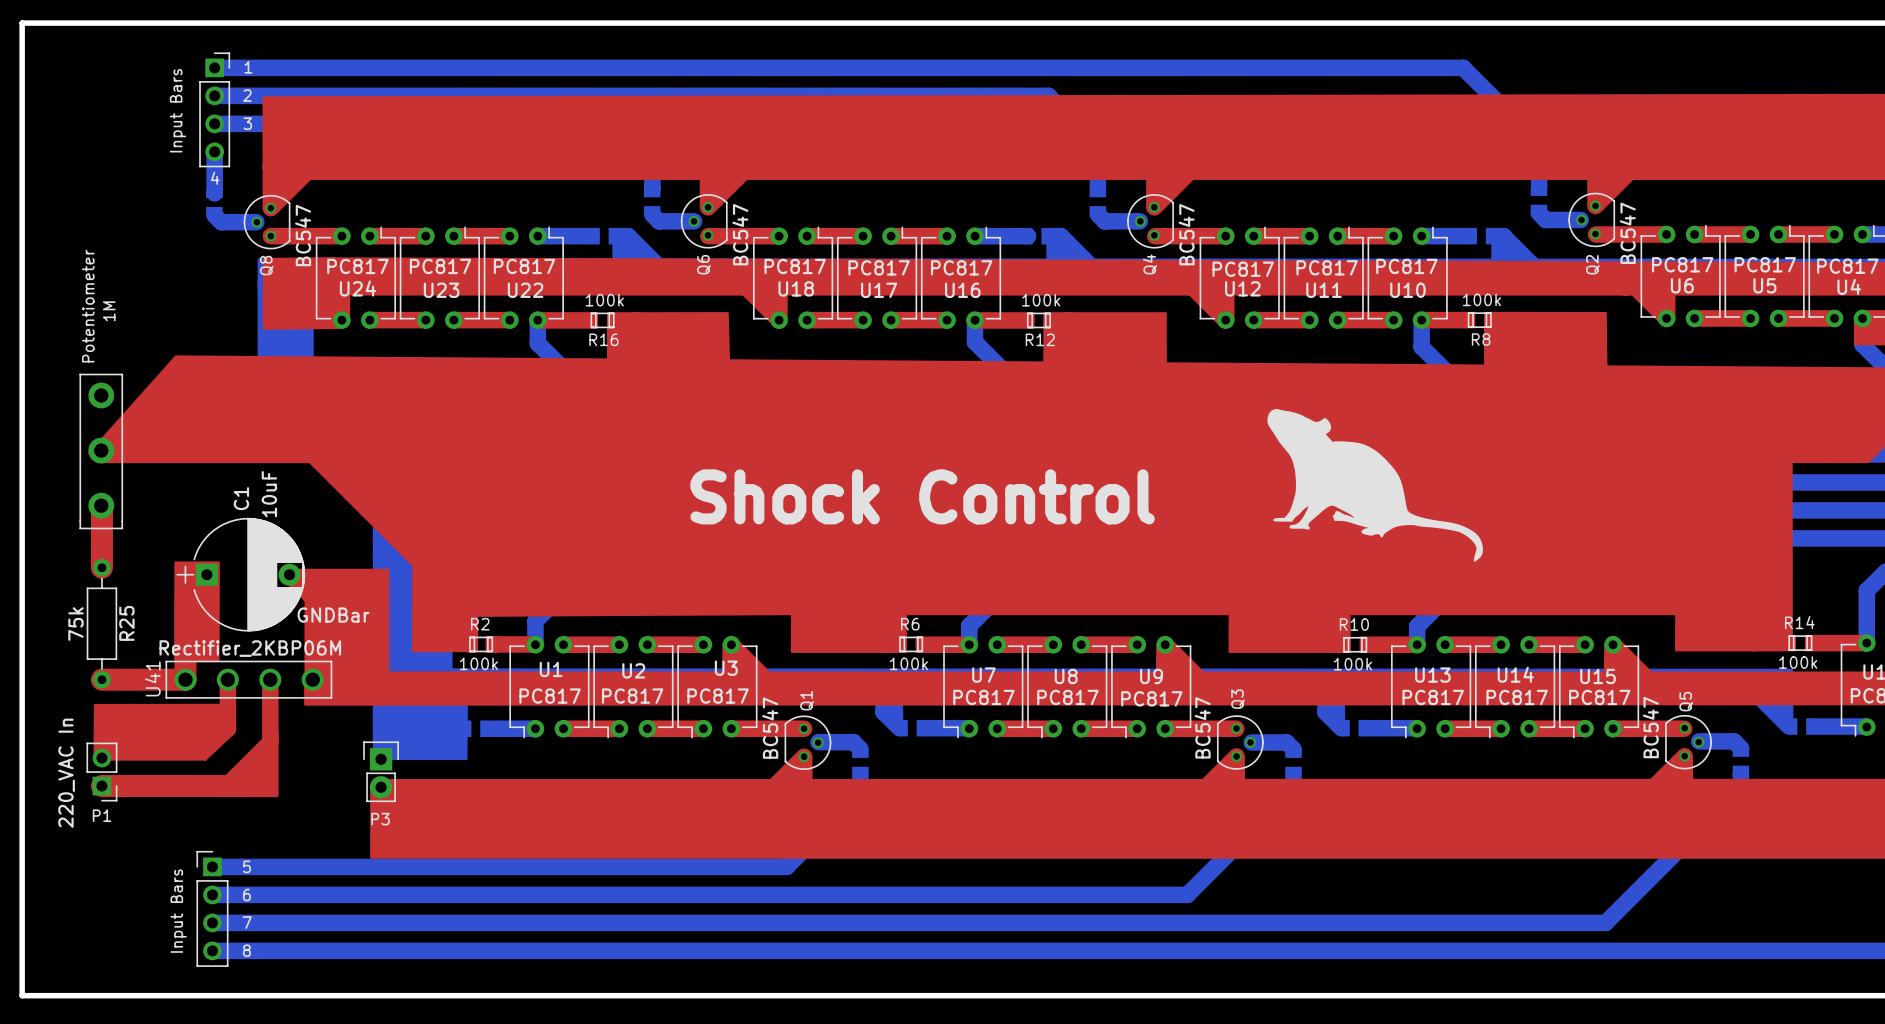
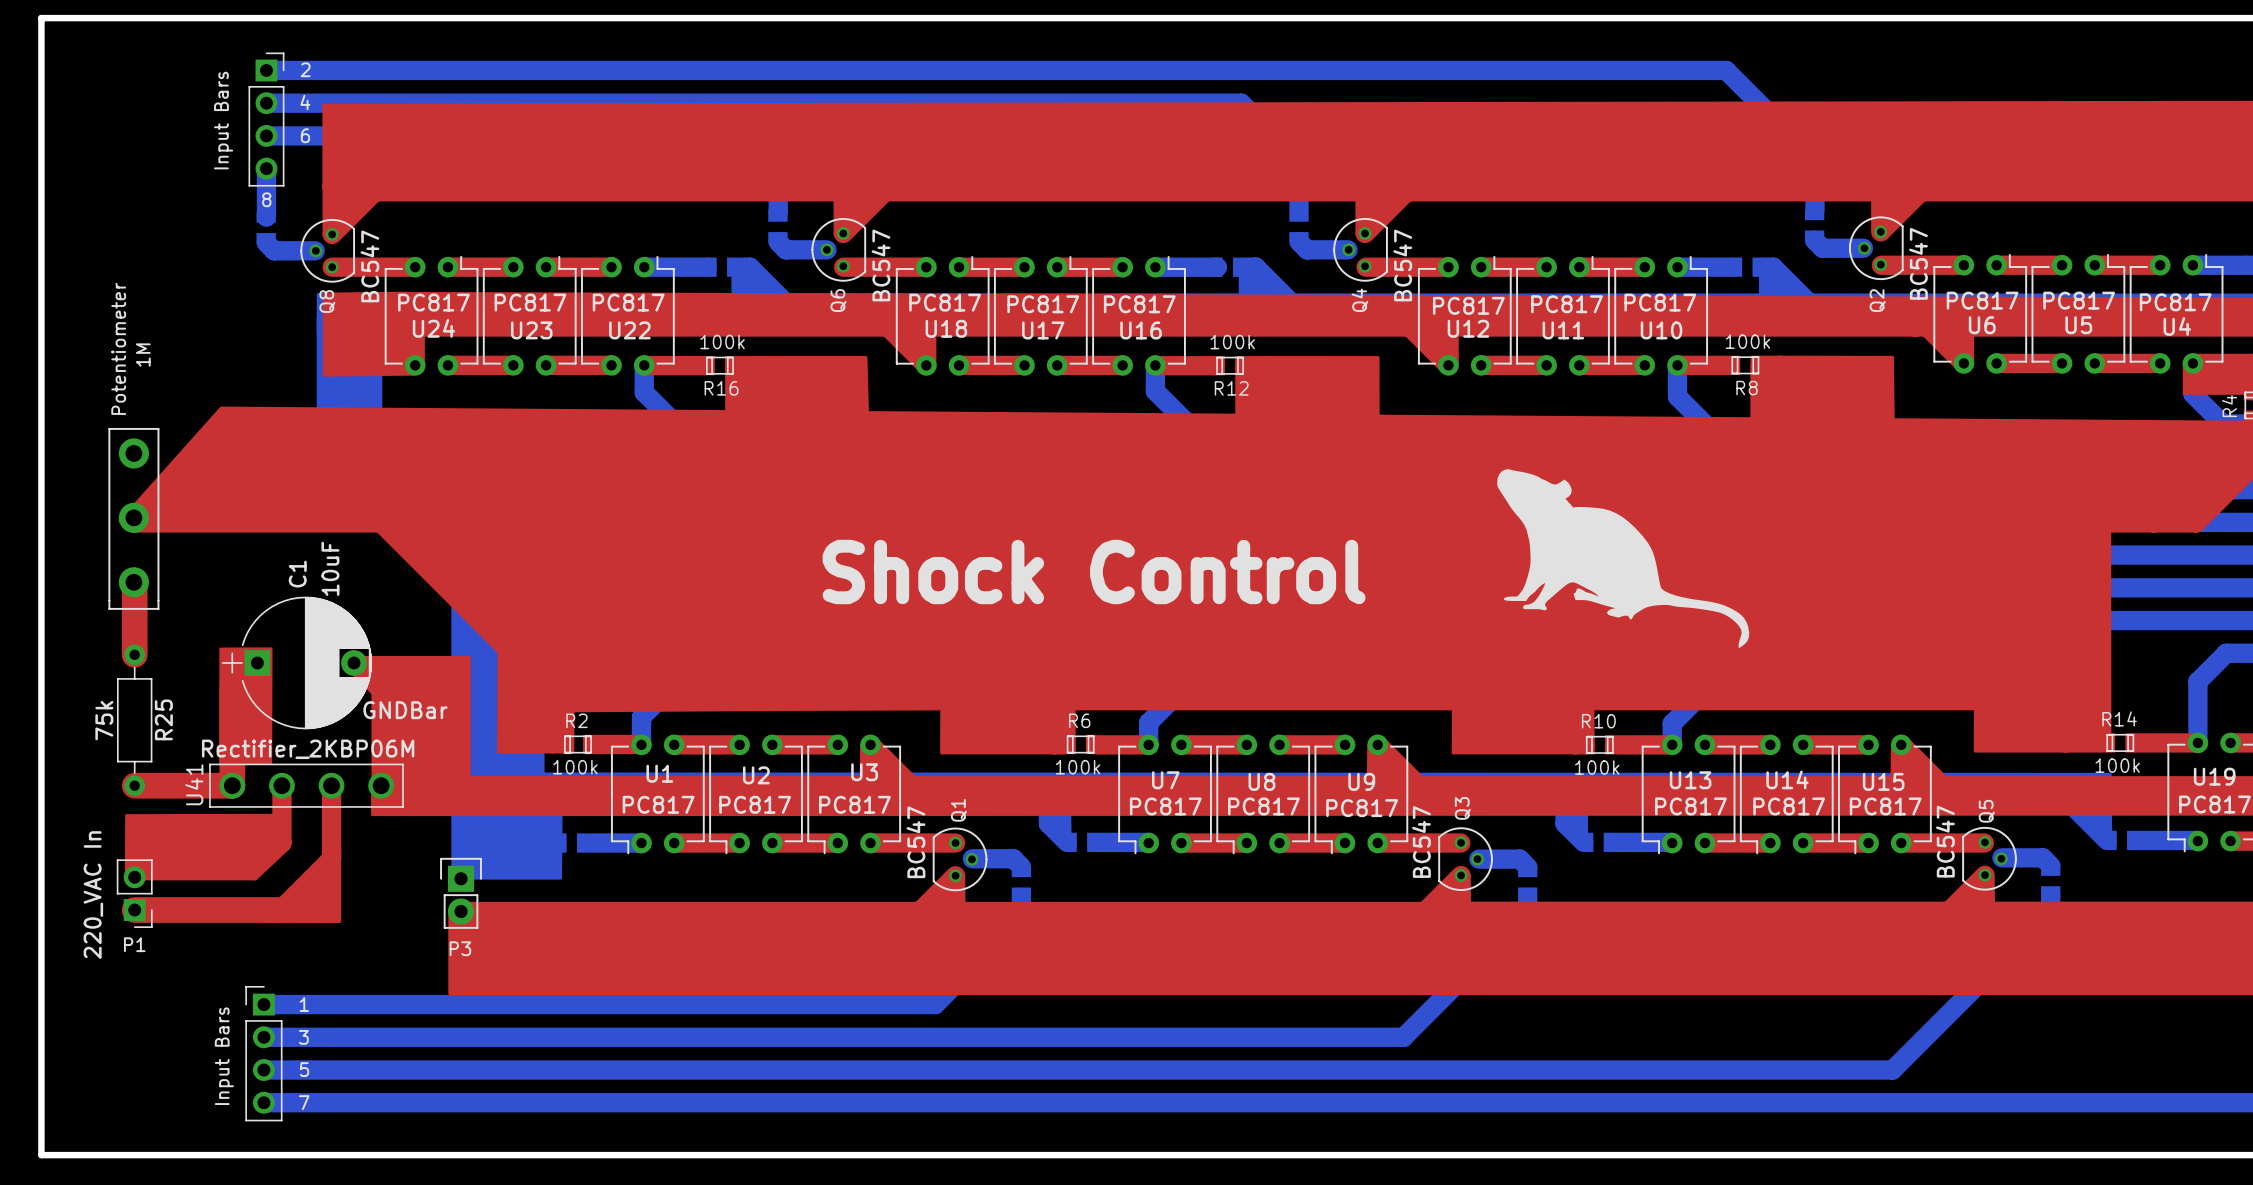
text: 1 (248, 67) -> 2 (305, 69)
text: 2 (247, 95) -> 4 (305, 102)
text: 3 (247, 123) -> 6 (305, 135)
text: 4 (215, 178) -> 8 (266, 199)
text: 5 (247, 866) -> 1 (304, 1004)
text: 6 (246, 894) -> 3 (303, 1037)
text: 7 (247, 922) -> 5 (304, 1069)
text: 8 (246, 950) -> 7 (304, 1102)

